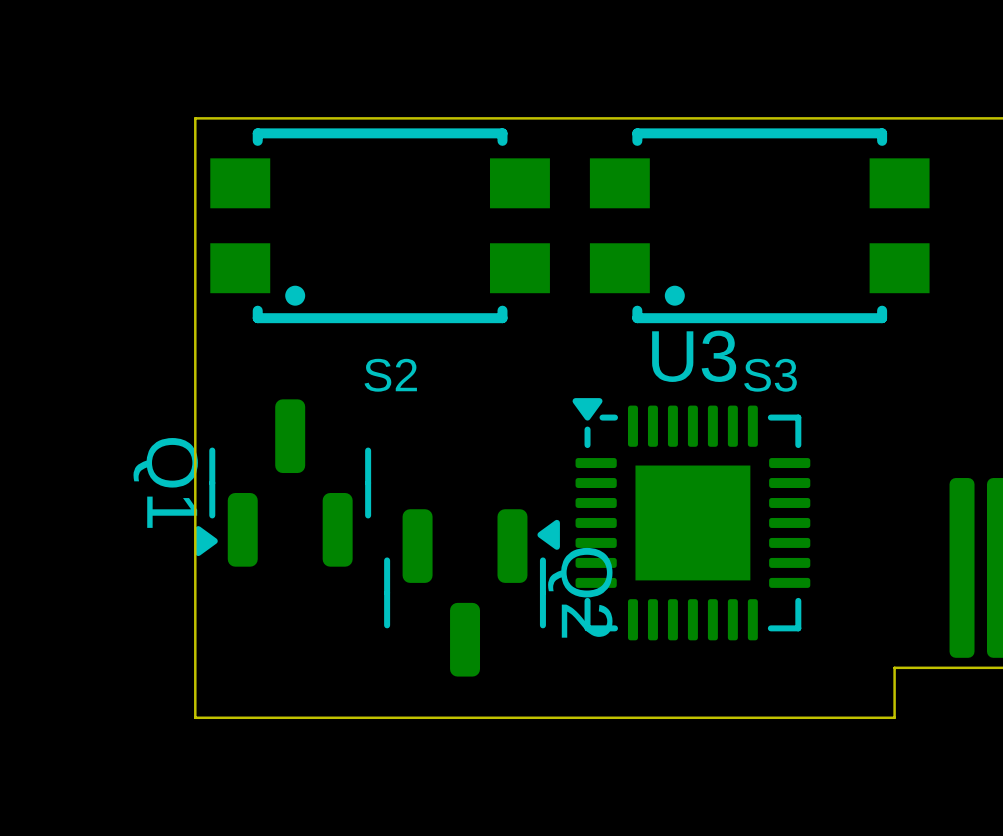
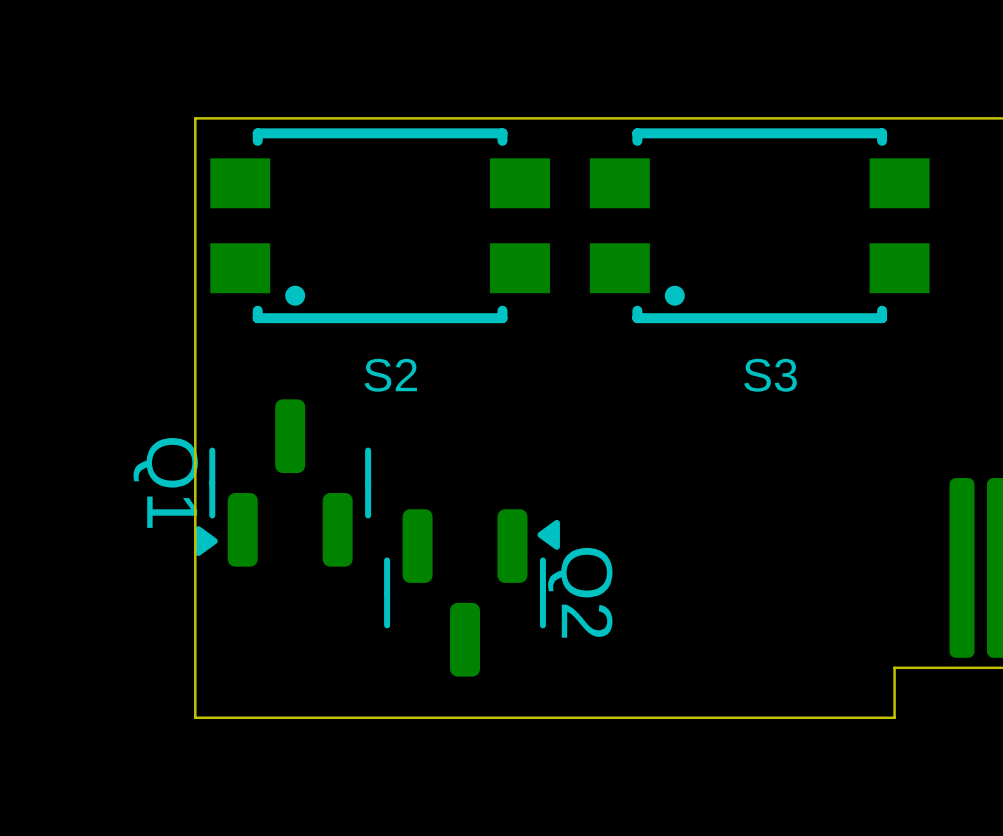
U3: (691, 519) -> none

